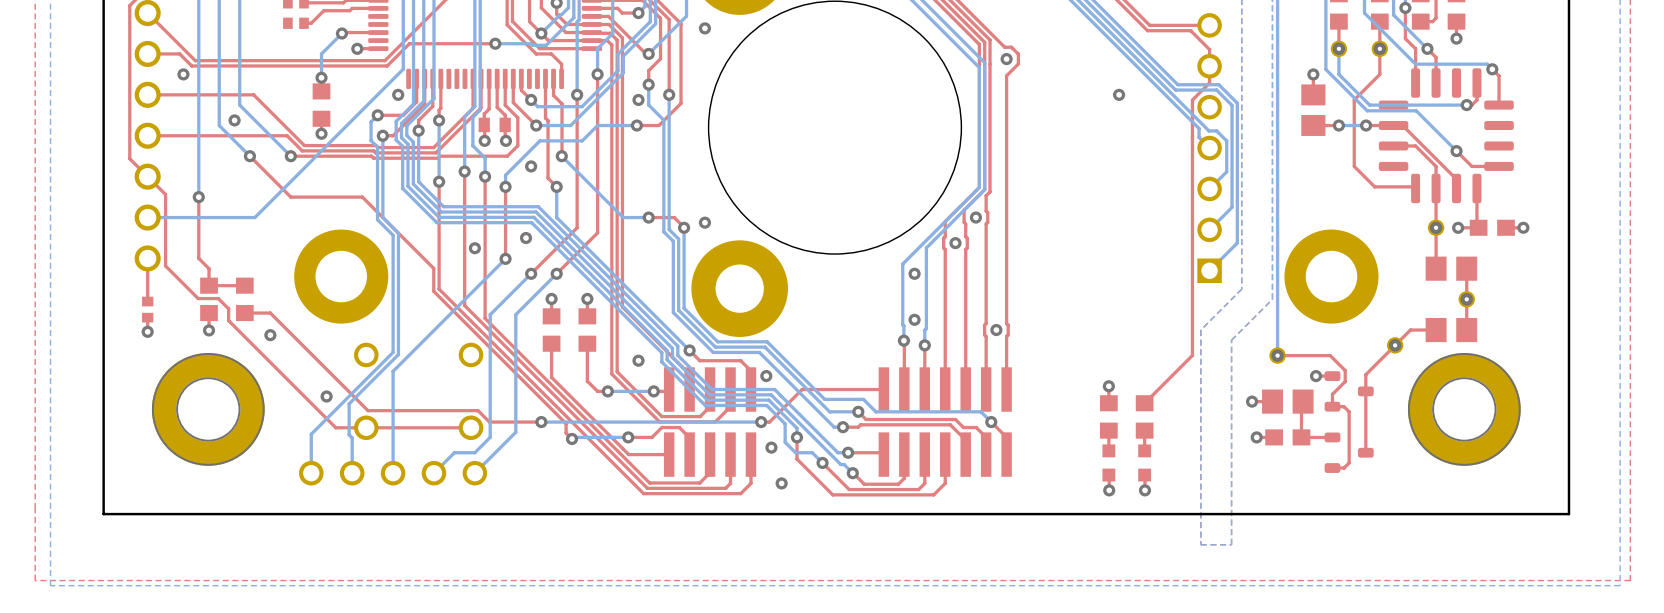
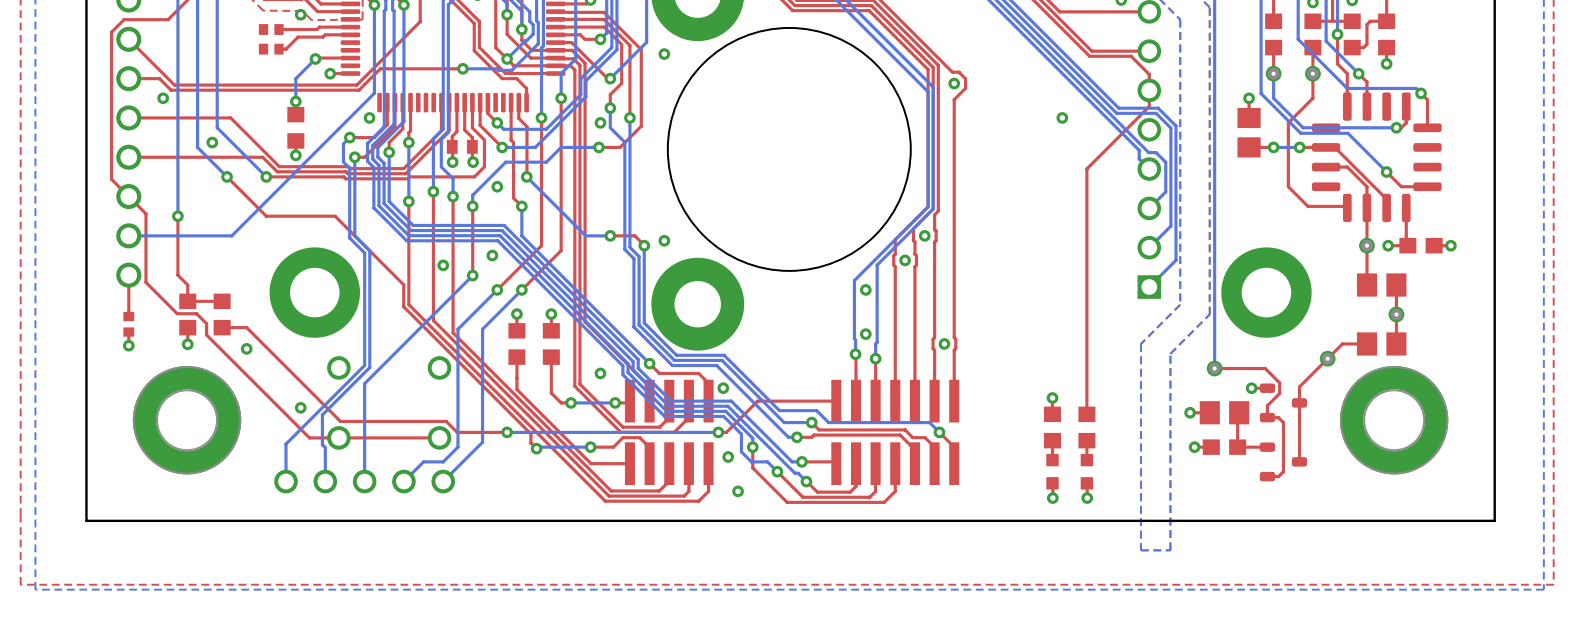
top track: (1192, 100) (1192, 355) (1144, 403) -> (1132, 122) (1086, 168) (1086, 414)

